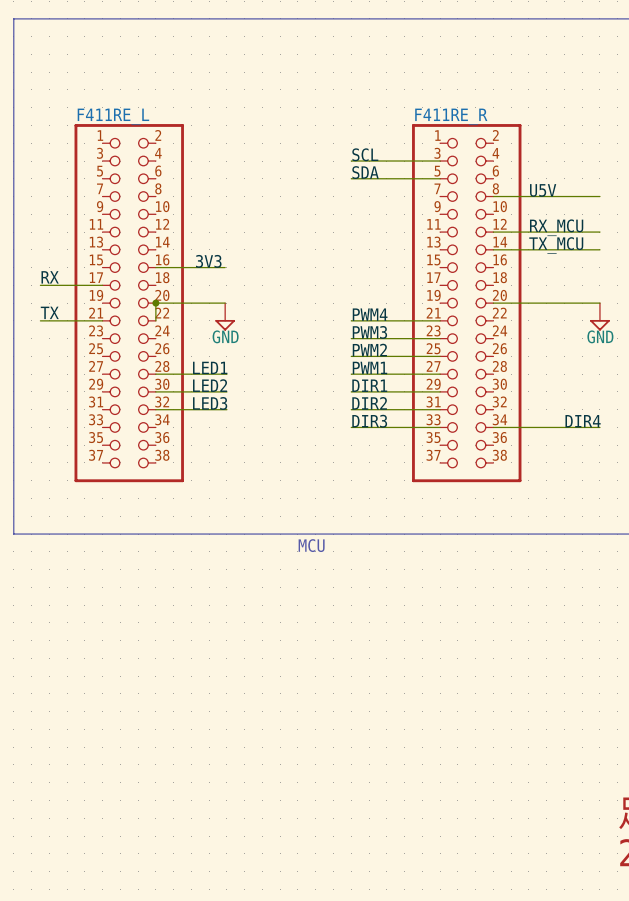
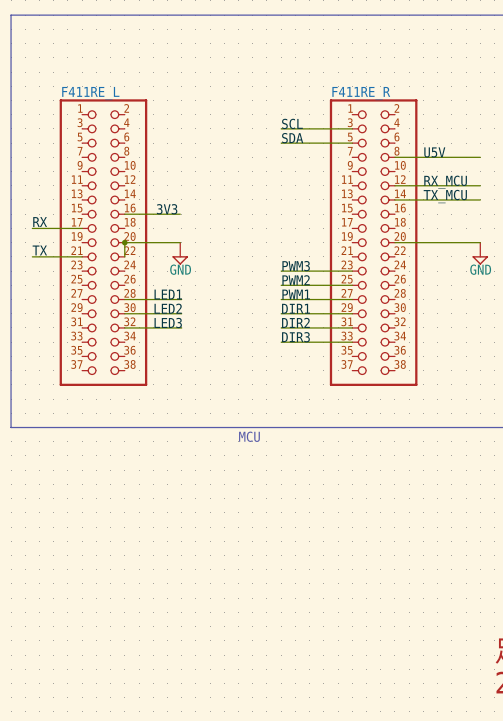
label: PWM4 (370, 314) -> none
wire: (351, 320) (440, 320) -> none
label: DIR4 (583, 421) -> none
wire: (493, 427) (599, 427) -> none

